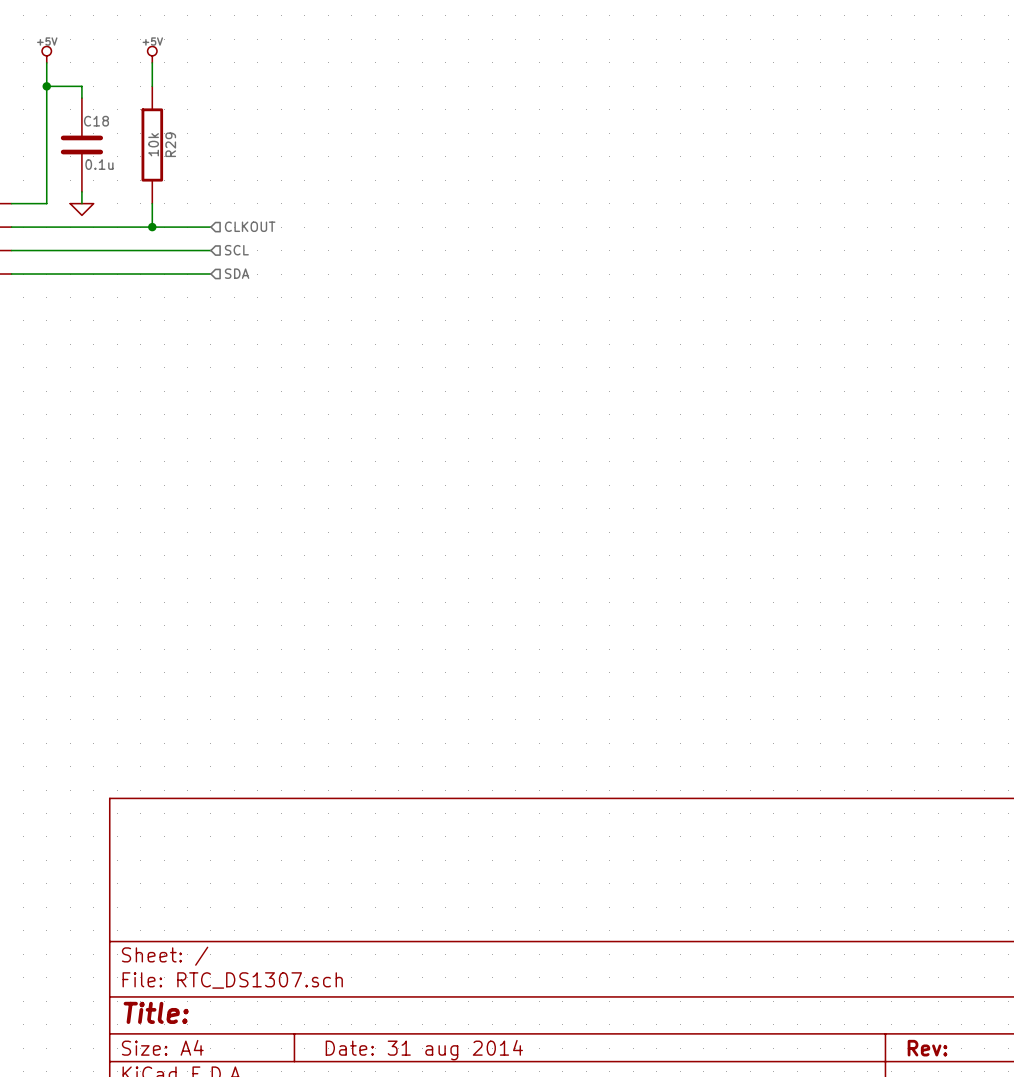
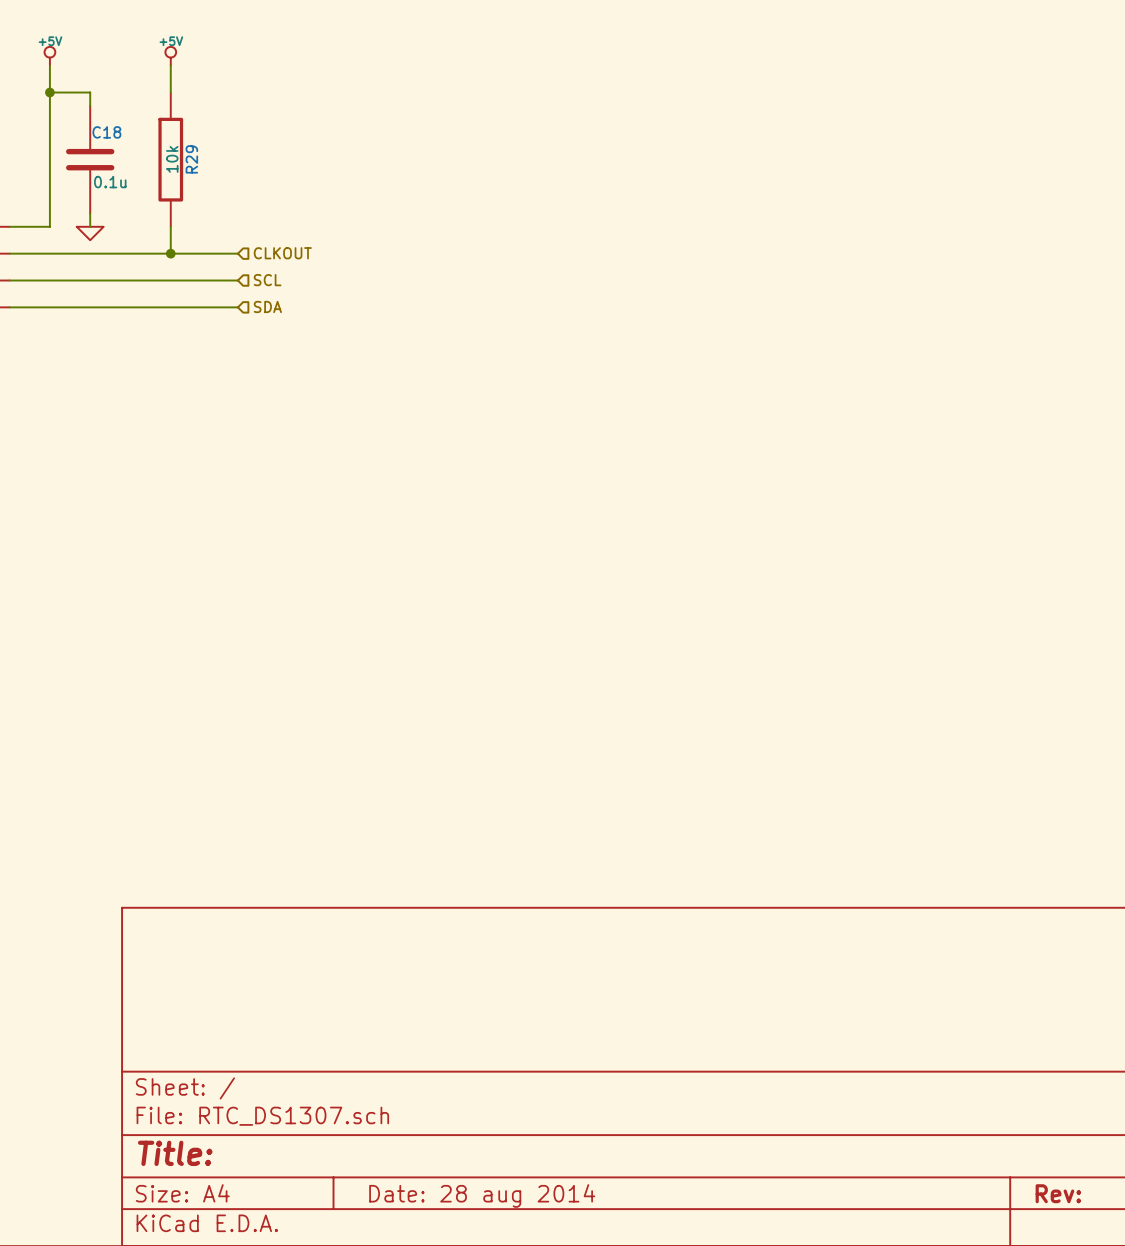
title block: Date: 31 aug 2014 (424, 1050) -> Date: 28 aug 2014 (482, 1195)

